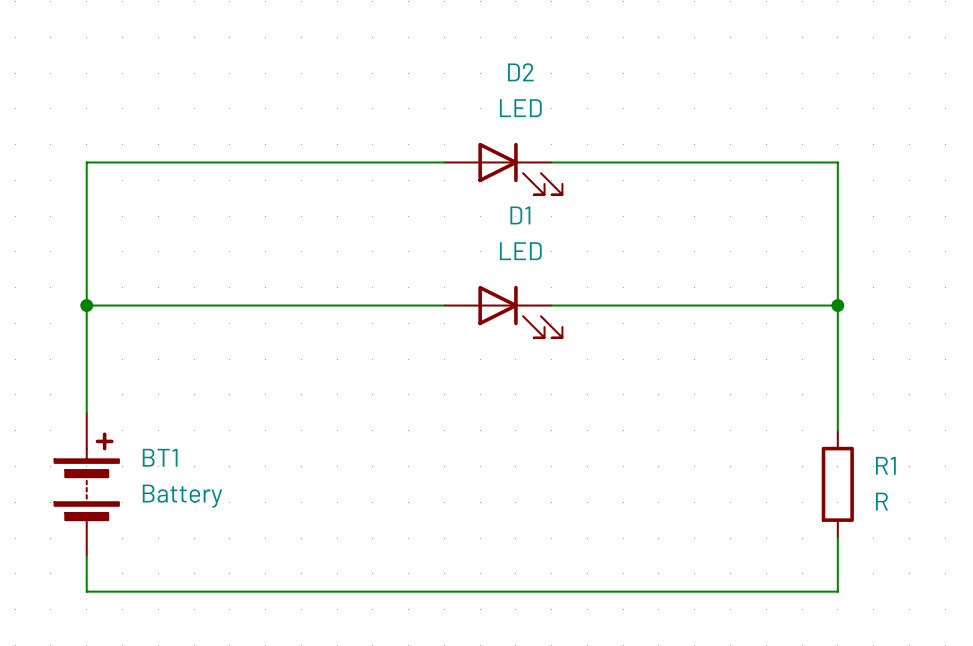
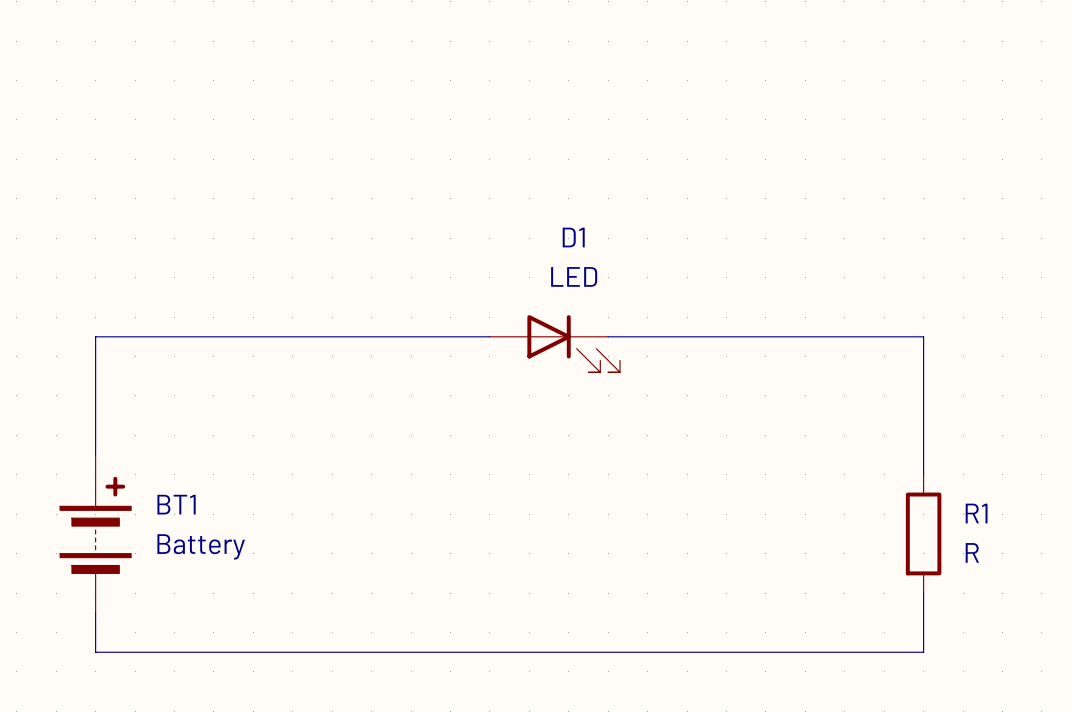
wire: (444, 162) (86, 162) (86, 305) -> none
wire: (551, 162) (837, 162) (837, 305) -> none
D2: LED (503, 168) -> none
junction: (86, 305) -> none
junction: (837, 305) -> none

